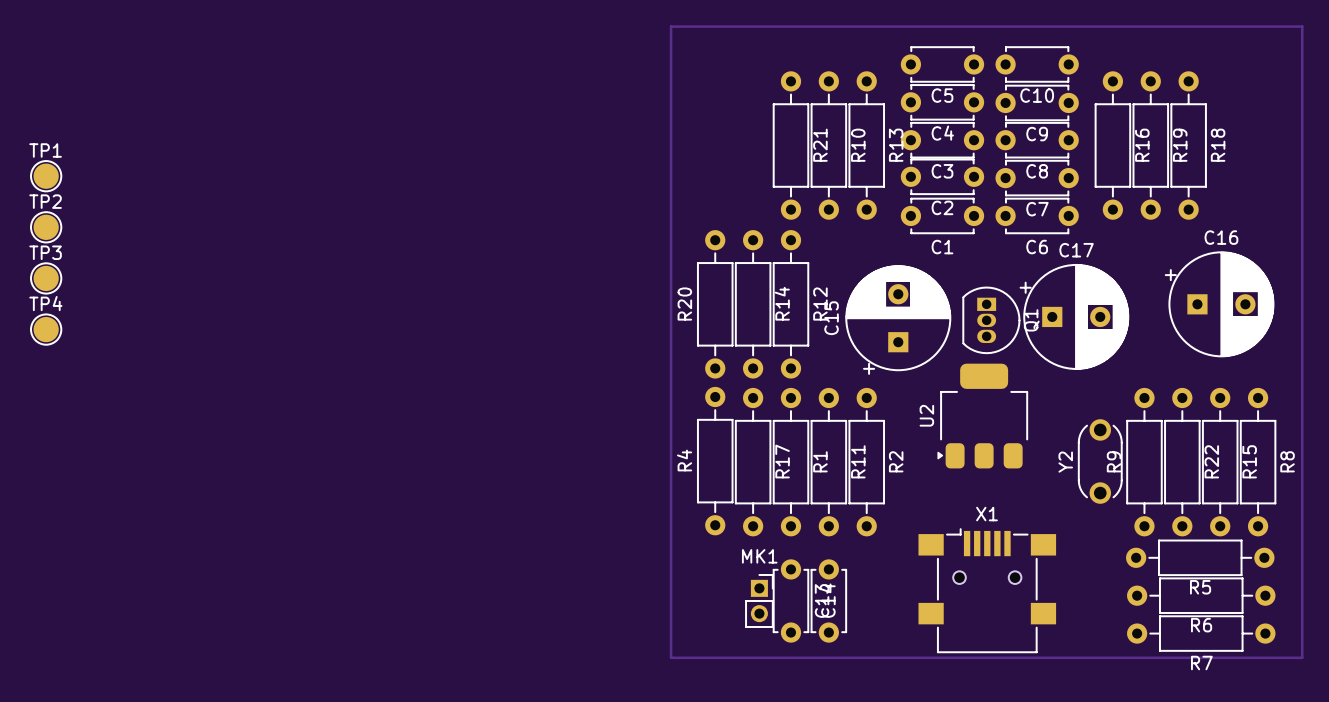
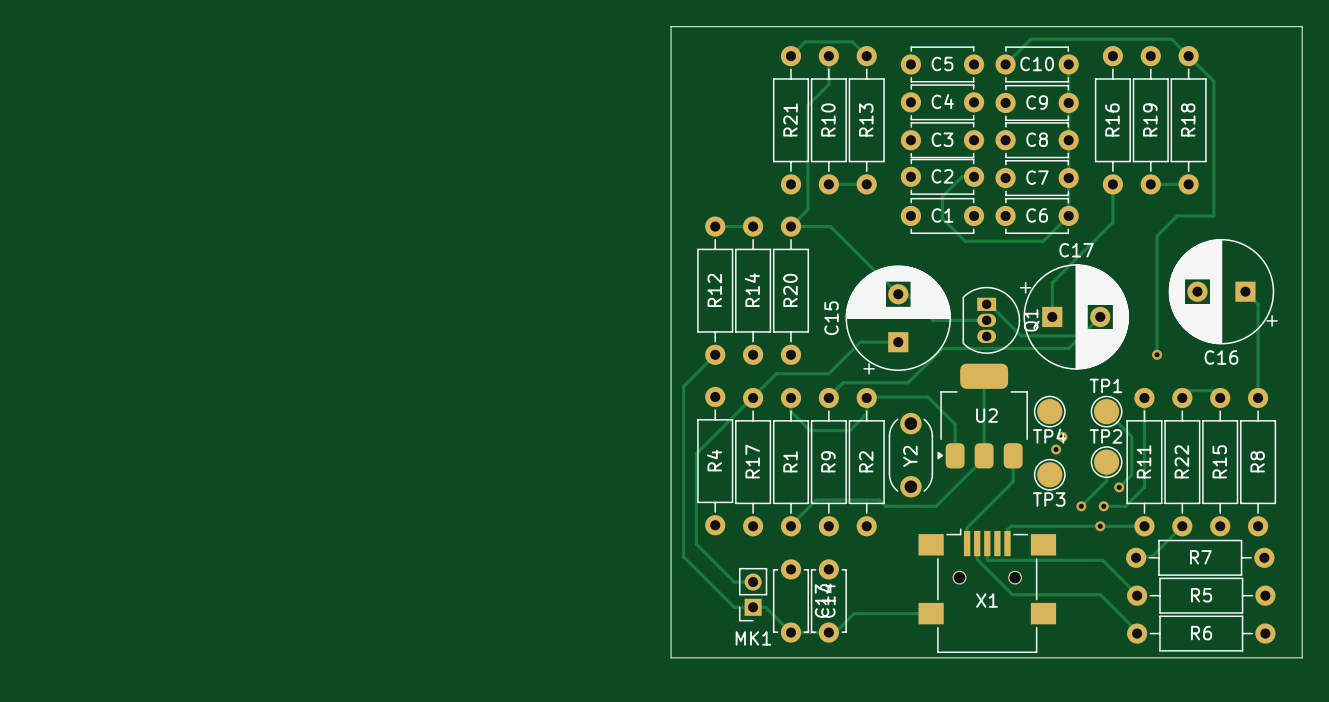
track: (671, 26) (1302, 26) (1302, 657) (671, 657) (671, 26) -> none
board edge: none -> (671, 26) (1302, 26) (1302, 657) (671, 657) (671, 26)
track: none -> (790, 56) (805, 41) (852, 41) (866, 56)
track: none -> (828, 56) (828, 84) (807, 105) (807, 209) (790, 226) (830, 226) (898, 294) (907, 294) (933, 320) (986, 320)
track: none -> (1005, 64) (1030, 39) (1171, 39) (1213, 81) (1213, 215) (1177, 215) (1157, 236) (1157, 354)
track: none -> (1068, 64) (1068, 215) (1043, 241) (965, 241) (942, 218) (942, 196) (962, 176) (974, 176)
C5 name position: C5 (942, 95) -> C5 (942, 63)
C10 name position: C10 (1037, 95) -> C10 (1037, 63)
C4 name position: C4 (942, 133) -> C4 (942, 101)
C9 name position: C9 (1037, 134) -> C9 (1037, 102)
R21 position: (790, 145) -> (790, 120)
R21 name position: R21 (820, 145) -> R21 (790, 119)
R10 position: (828, 145) -> (866, 120)
R10 name position: R10 (858, 145) -> R10 (828, 119)
R13 position: (866, 145) -> (828, 120)
R13 name position: R13 (896, 145) -> R13 (866, 119)
R16 position: (1112, 145) -> (1112, 120)
R16 name position: R16 (1142, 145) -> R16 (1112, 119)
R19 position: (1150, 145) -> (1150, 120)
R19 name position: R19 (1180, 145) -> R19 (1150, 119)
R18 position: (1188, 145) -> (1188, 120)
R18 name position: R18 (1218, 145) -> R18 (1188, 119)
C3 name position: C3 (942, 171) -> C3 (942, 139)
C8 name position: C8 (1037, 171) -> C8 (1037, 139)
TP1 position: (46, 176) -> (1106, 411)
track: none -> (828, 184) (866, 184)
track: none -> (1112, 184) (1112, 222) (1052, 282) (1052, 316)
track: none -> (1150, 184) (1188, 184)
C2 name position: C2 (942, 207) -> C2 (942, 176)
C7 name position: C7 (1037, 209) -> C7 (1037, 177)
track: none -> (715, 226) (753, 226)
TP2 position: (46, 227) -> (1106, 462)
C1 name position: C1 (942, 247) -> C1 (942, 215)
C6 name position: C6 (1037, 247) -> C6 (1037, 215)
TP3 name position: TP3 (45, 252) -> TP3 (1049, 499)
TP3 position: (46, 278) -> (1049, 474)
track: none -> (1245, 291) (1258, 304) (1258, 390)
TP4 name position: TP4 (45, 303) -> TP4 (1049, 436)
R14 name position: R14 (782, 303) -> R14 (752, 290)
R20 name position: R20 (684, 304) -> R20 (790, 290)
R20 position: (715, 304) -> (790, 290)
R14 position: (753, 304) -> (753, 290)
R12 position: (790, 304) -> (715, 290)
R12 name position: R12 (820, 304) -> R12 (714, 290)
track: none -> (986, 304) (989, 304) (1021, 335) (1081, 335)
C16 rotation: 0° (1219, 304) -> 180° (1223, 291)
track: none -> (1100, 316) (1068, 348) (942, 348) (908, 382) (843, 382) (828, 396)
TP4 position: (46, 329) -> (1049, 411)
track: none -> (898, 342) (860, 342) (828, 373) (776, 373) (696, 453) (696, 544) (734, 582) (753, 582)
track: none -> (715, 354) (683, 386) (683, 556) (734, 607) (765, 607) (790, 632) (835, 632) (854, 613) (931, 613)
via: none -> (1157, 354)
track: none -> (984, 376) (984, 458) (936, 506) (885, 506) (879, 500) (816, 500) (790, 525)
track: none -> (1144, 390) (1144, 487) (1125, 506) (1103, 506)
track: none -> (1182, 390) (1220, 390)
track: none -> (790, 396) (790, 411) (809, 430) (849, 430) (866, 413) (866, 396) (927, 396) (955, 424) (955, 455)
track: none -> (1106, 411) (1131, 436) (1131, 474) (1119, 487)
U2 name rotation: 0° (926, 415) -> 90° clockwise (986, 415)
U2 name position: U2 (926, 415) -> U2 (986, 415)
via: none -> (1062, 436)
via: none -> (1056, 449)
track: none -> (1013, 455) (1013, 481) (967, 527) (967, 543)
R4 name position: R4 (684, 460) -> R4 (714, 460)
R17 name position: R17 (782, 461) -> R17 (752, 461)
R1 name position: R1 (820, 461) -> R1 (790, 461)
R11 name: R11 (858, 461) -> R9 (828, 461)
R2 name position: R2 (896, 461) -> R2 (866, 461)
Y2 position: (1100, 461) -> (910, 455)
R9 name: R9 (1114, 461) -> R11 (1143, 461)
R22 name position: R22 (1211, 461) -> R22 (1181, 461)
R15 name position: R15 (1249, 461) -> R15 (1219, 461)
R8 name position: R8 (1287, 461) -> R8 (1257, 461)
Y2 name position: Y2 (1065, 462) -> Y2 (910, 456)
track: none -> (1106, 462) (1106, 481) (1081, 506)
via: none -> (1119, 487)
via: none -> (1081, 506)
via: none -> (1103, 506)
X1 name position: X1 (986, 514) -> X1 (986, 600)
via: none -> (1100, 526)
track: none -> (1144, 526) (1010, 526) (1007, 529) (1007, 543)
track: none -> (1182, 526) (1151, 556) (1137, 556)
track: none -> (977, 543) (977, 559) (1012, 594) (1100, 594) (1138, 632)
track: none -> (987, 543) (988, 560) (1102, 560) (1137, 594)
R5 name: R5 (1200, 587) -> R7 (1200, 557)
MK1 rotation: 0° (759, 600) -> 180° (753, 594)
R6 name: R6 (1201, 625) -> R5 (1201, 595)
R7 name: R7 (1201, 663) -> R6 (1201, 633)

